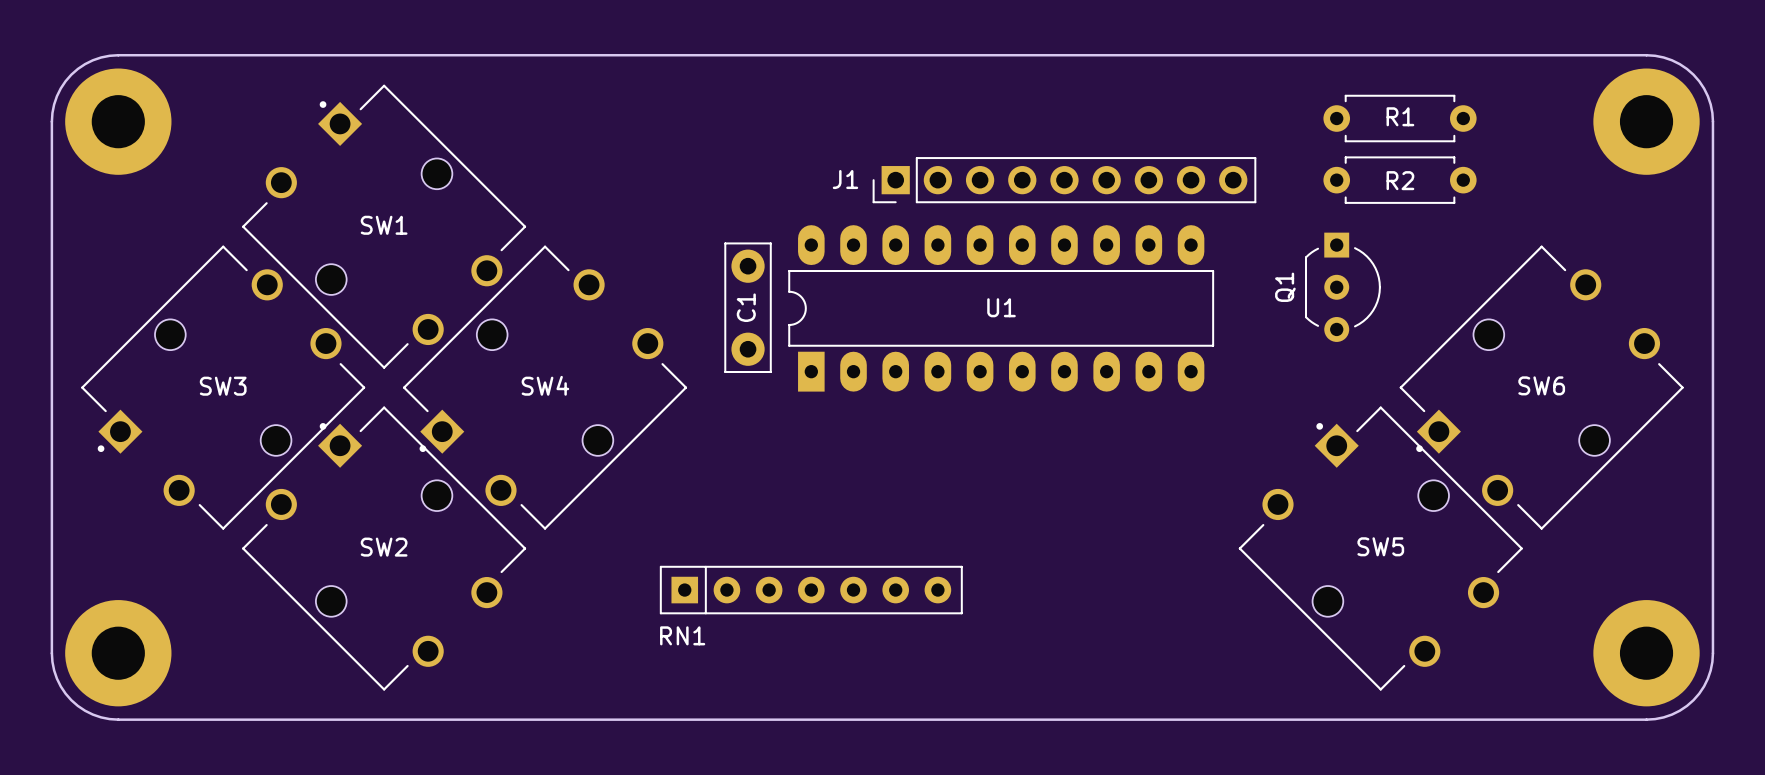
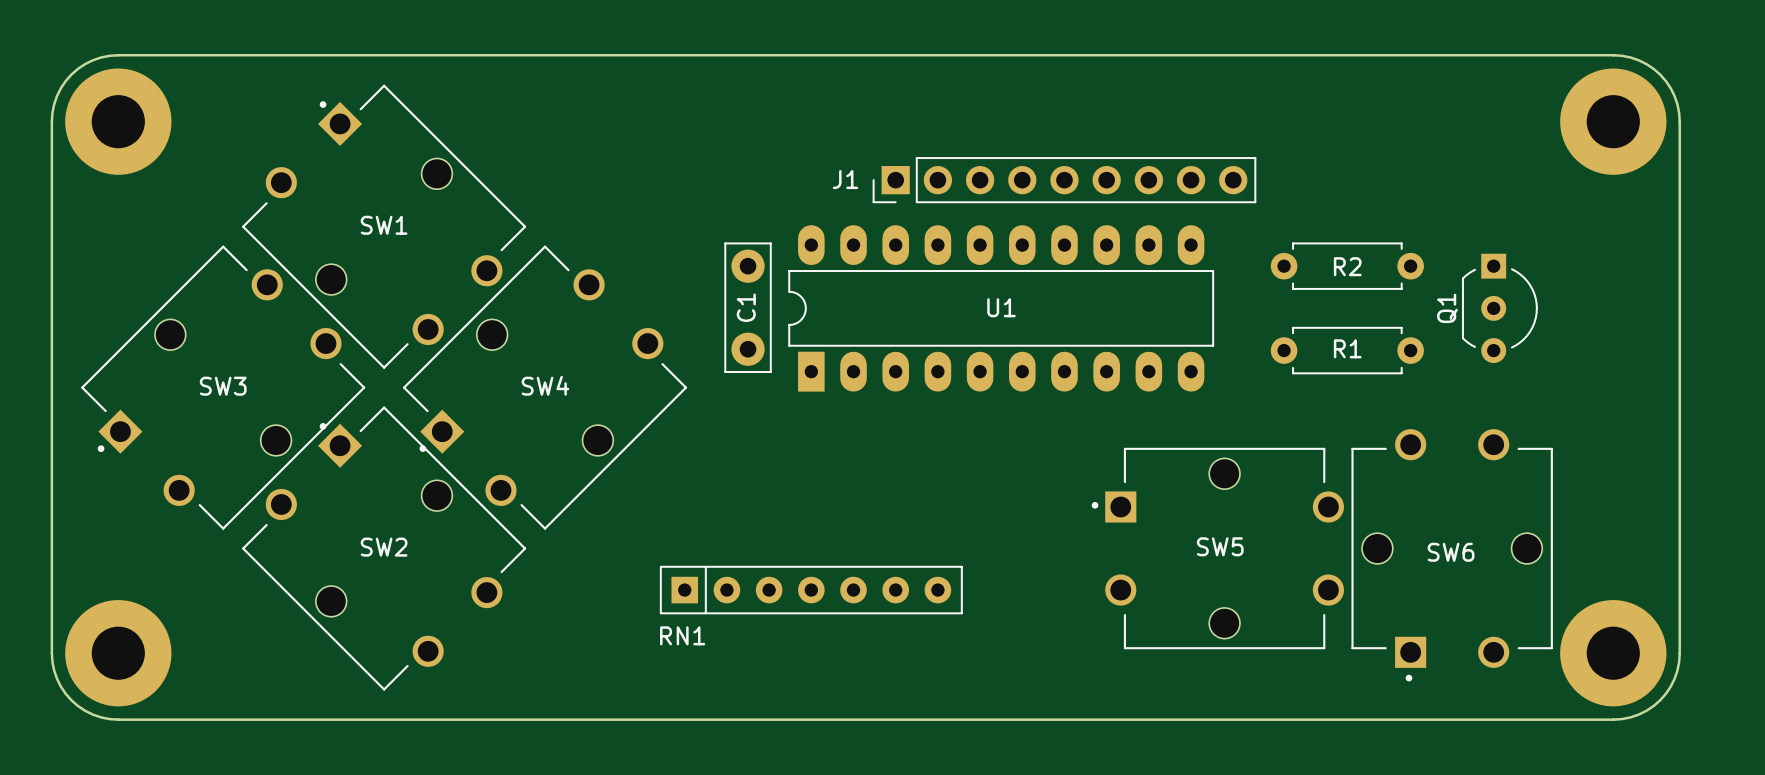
board edge: (1613, 55) (1655, 55) (1679, 64) (1693, 74) (1704, 88) (1710, 104) (1712, 121) (1712, 661) (1704, 686) (1693, 700) (1679, 710) (1655, 719) (1613, 719) -> (1613, 55) (1638, 60) (1660, 74) (1674, 96) (1679, 121) (1679, 661) (1670, 686) (1653, 705) (1630, 717) (1613, 719)
R1 position: (1400, 118) -> (1347, 350)
part position: (1646, 121) -> (1613, 121)
R2 position: (1400, 180) -> (1347, 266)
Q1 name position: Q1 (1285, 287) -> Q1 (1447, 308)
Q1 position: (1342, 287) -> (1499, 308)
SW6 rotation: 0° (1541, 387) -> 45° counterclockwise (1452, 555)
SW6 position: (1541, 387) -> (1452, 555)
SW5 rotation: 0° (1380, 548) -> 45° counterclockwise (1217, 548)
part position: (1646, 653) -> (1613, 653)

